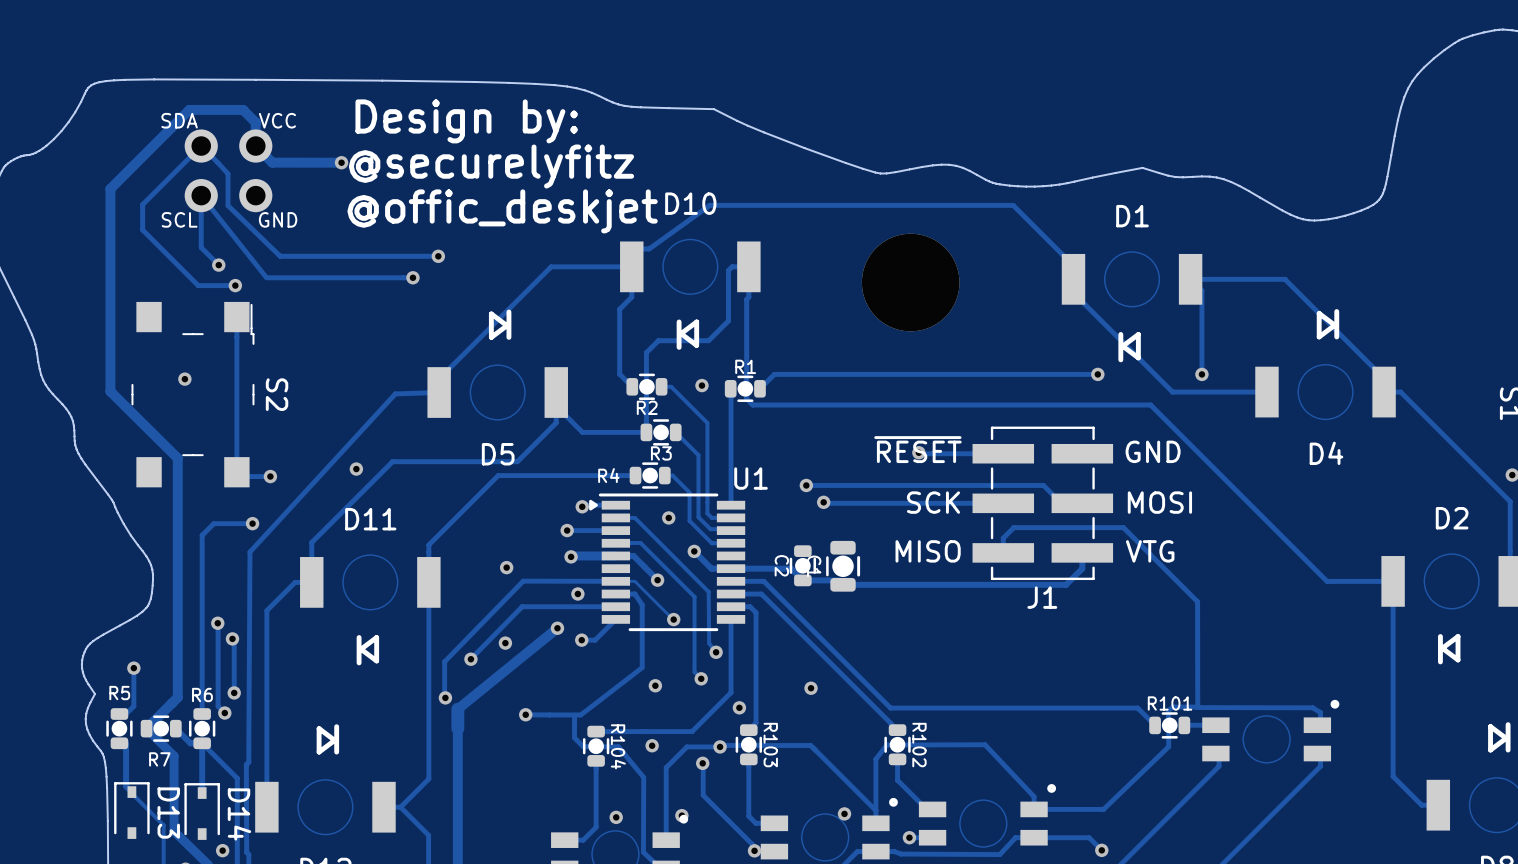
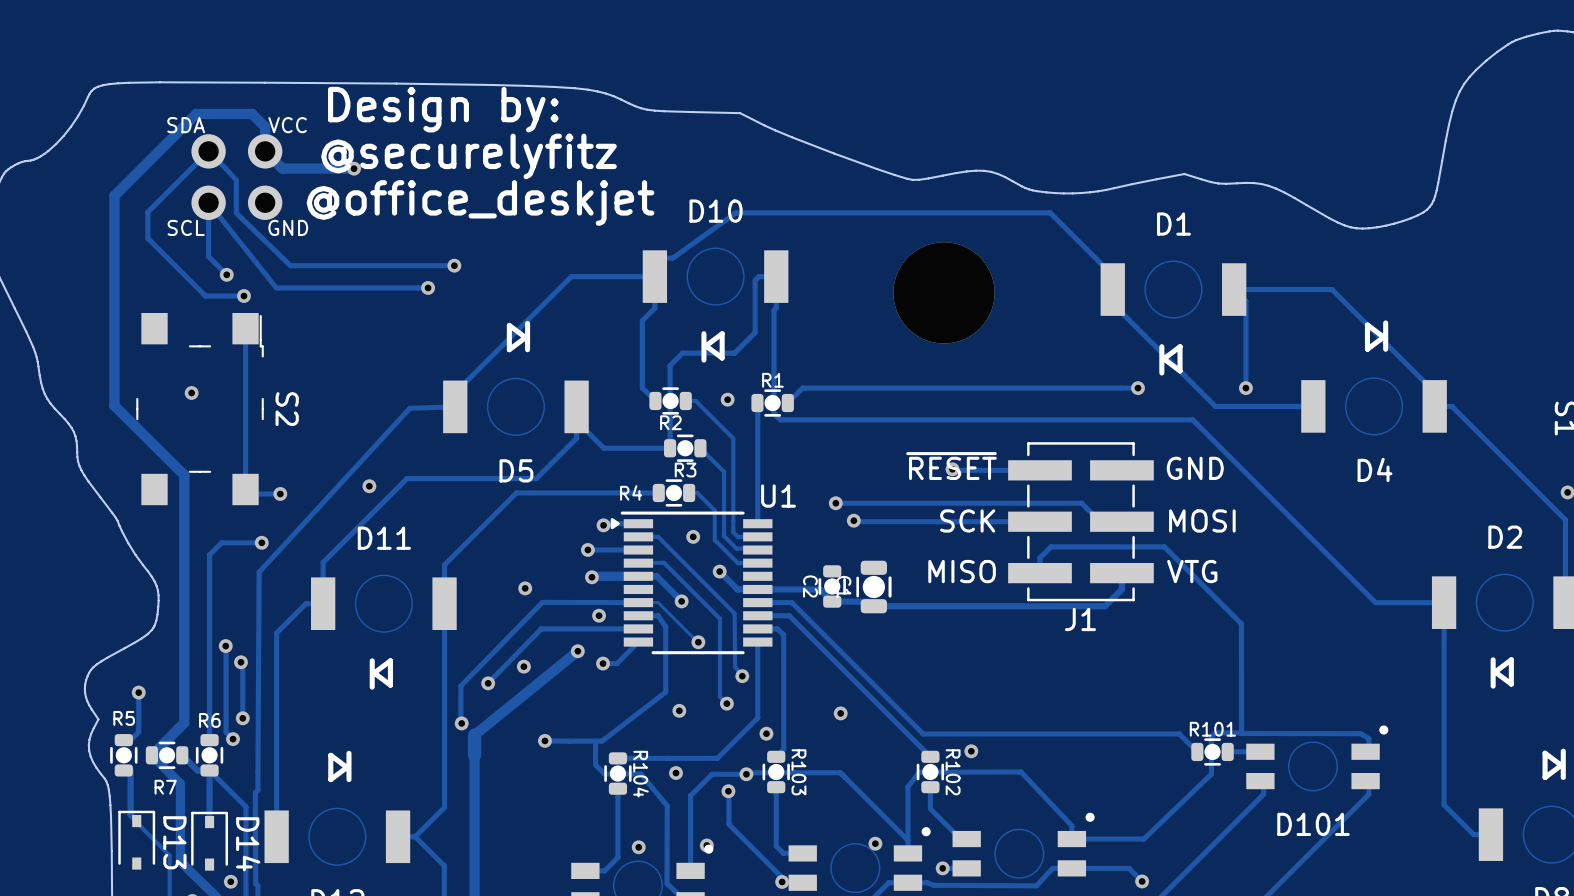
text position: Design by: (466, 121) -> Design by: (443, 109)
text position: @securelyfitz (491, 166) -> @securelyfitz (468, 156)
text: @offic_deskjet (502, 211) -> @office_deskjet (480, 202)
via: none -> (971, 751)
D101 name: none -> D101 (1313, 824)

